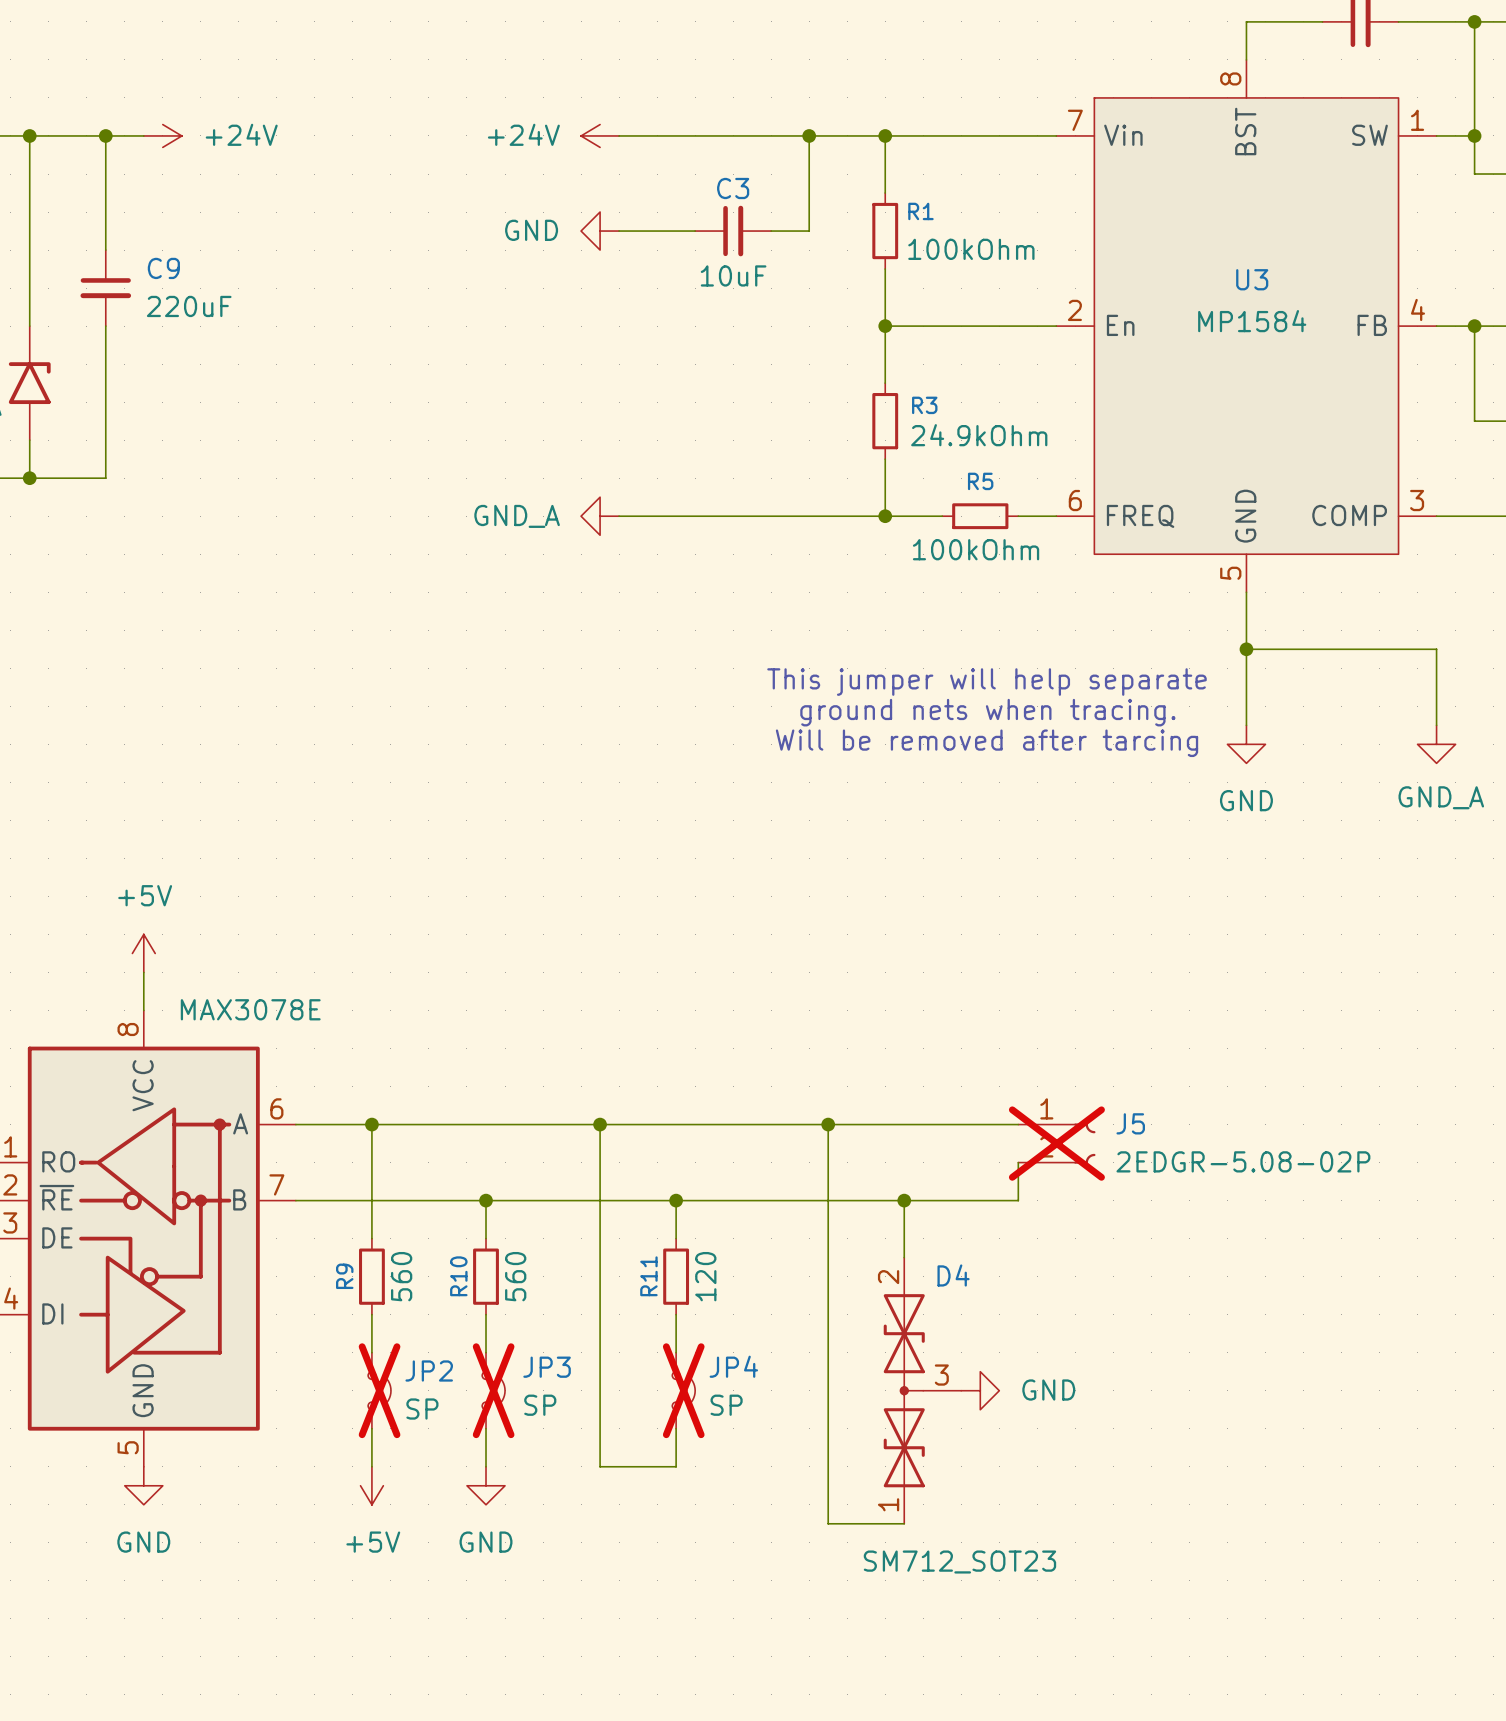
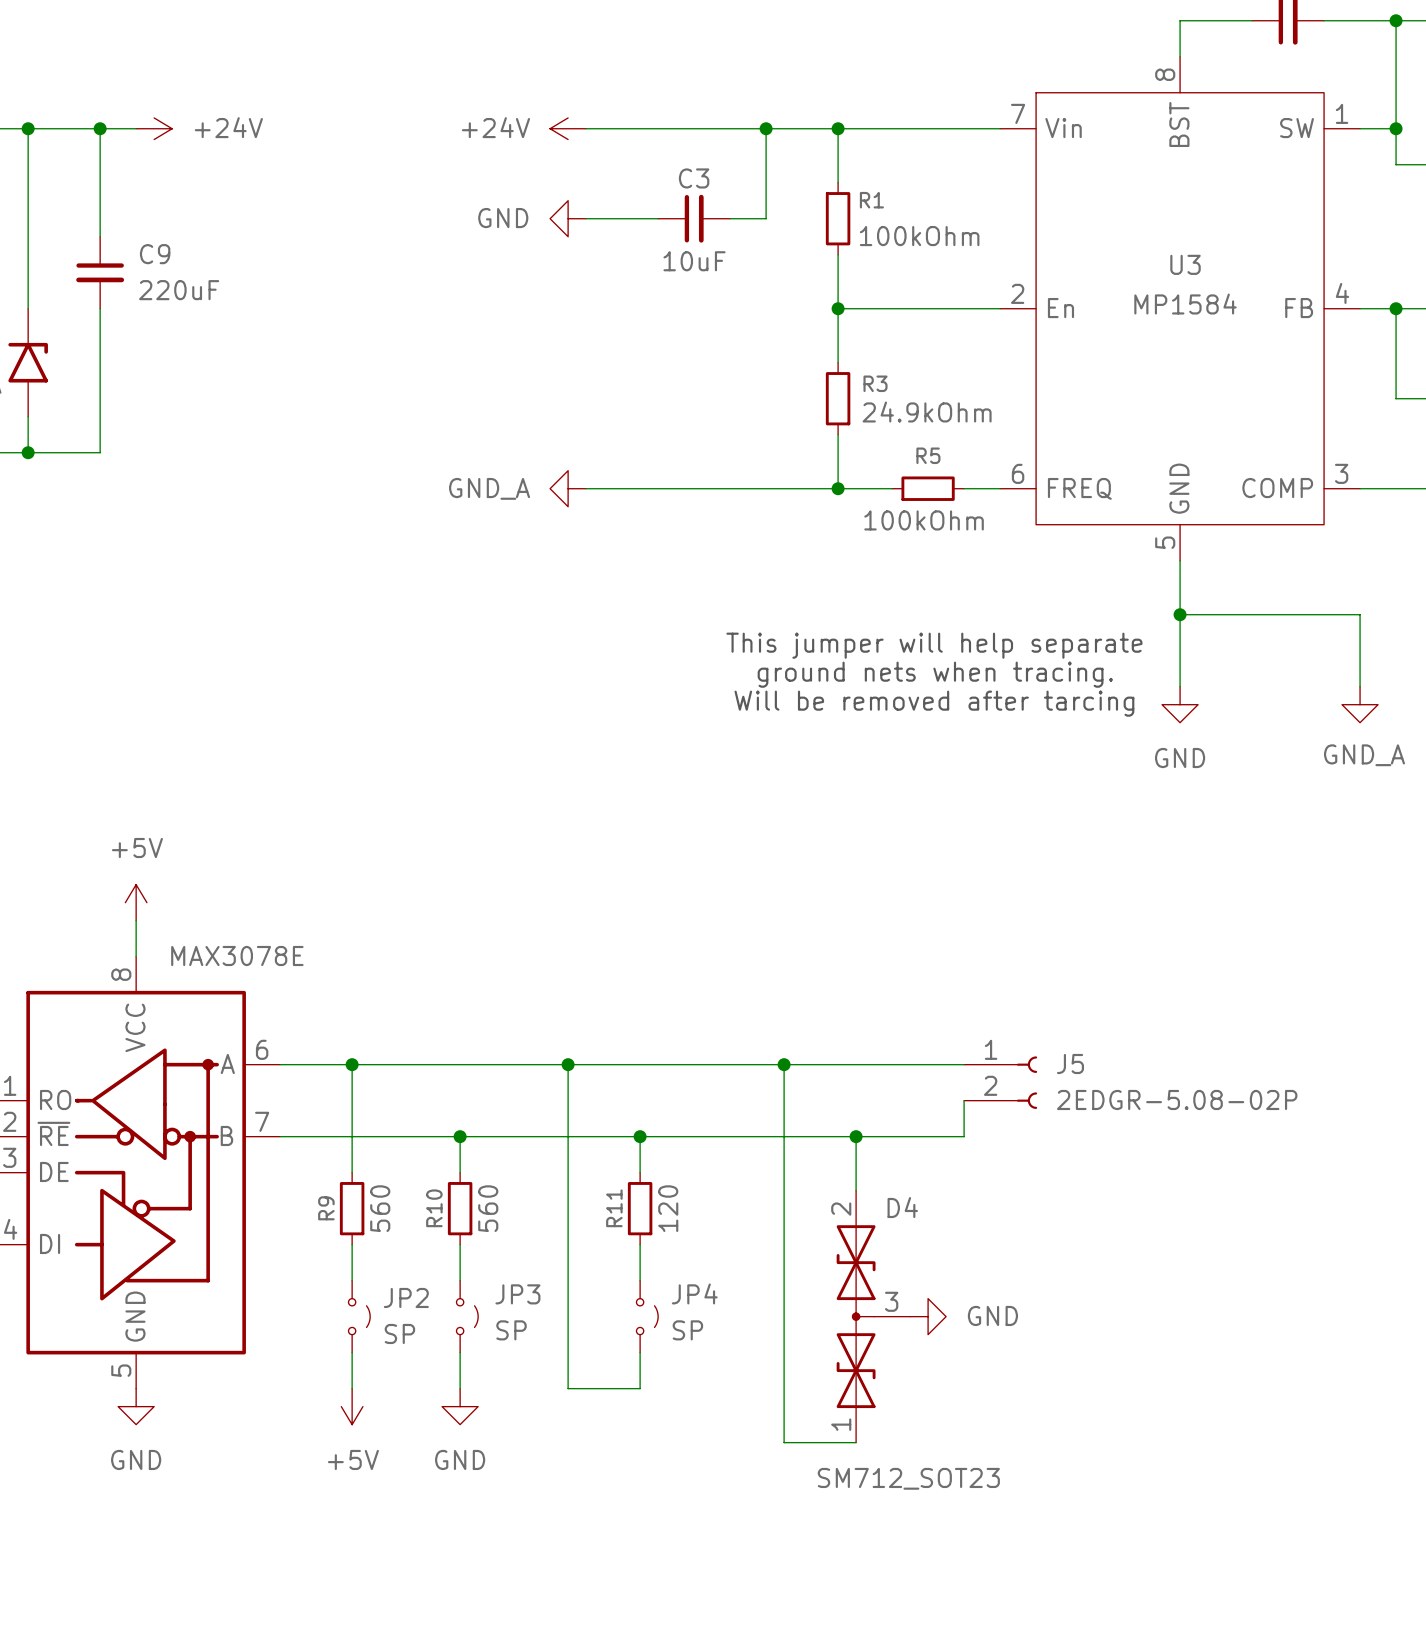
J5 do-not-place cross: (1056, 1143) -> none
JP2 do-not-place cross: (379, 1390) -> none
JP3 do-not-place cross: (493, 1390) -> none
JP4 do-not-place cross: (683, 1390) -> none

